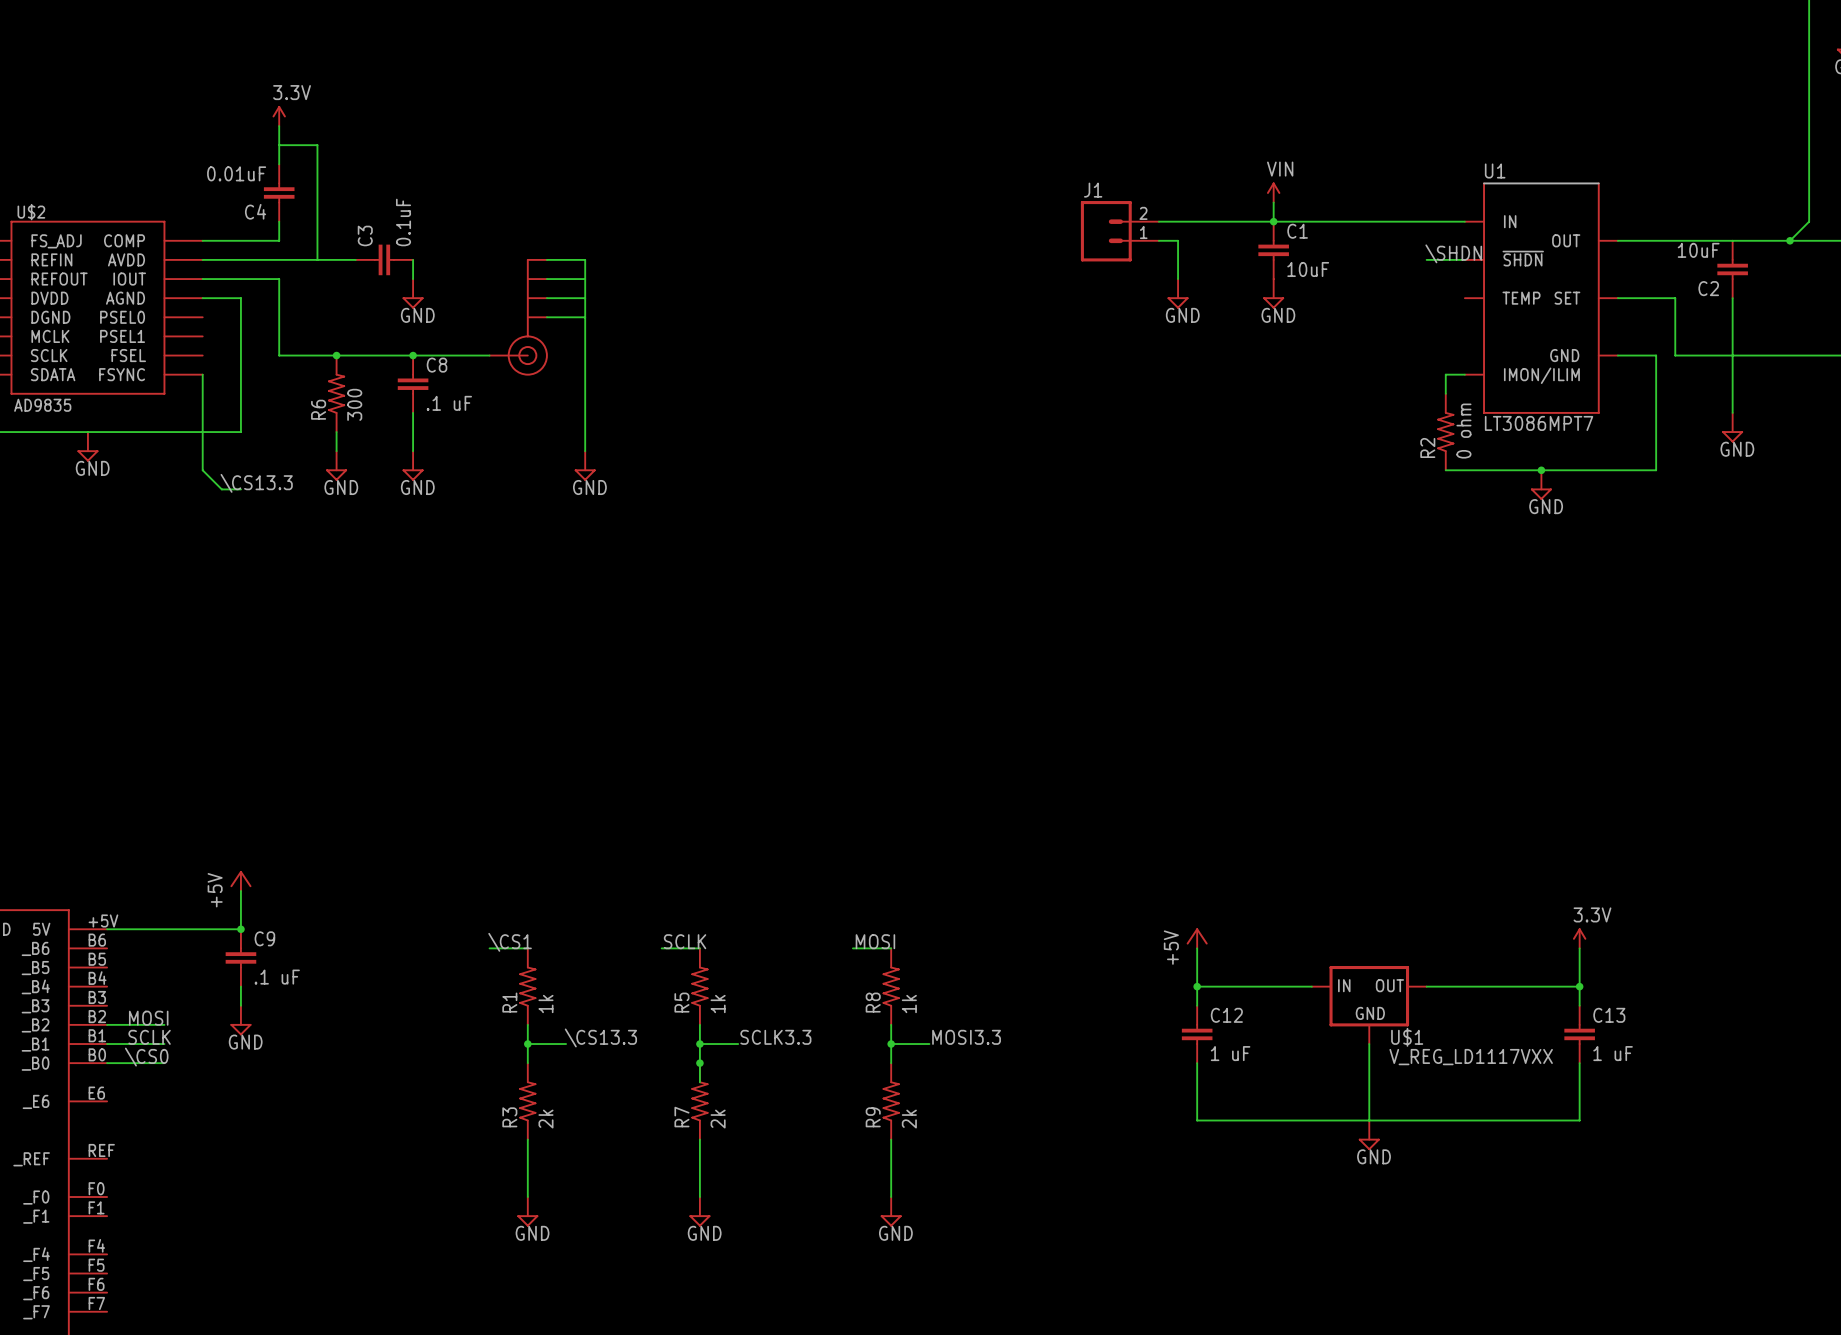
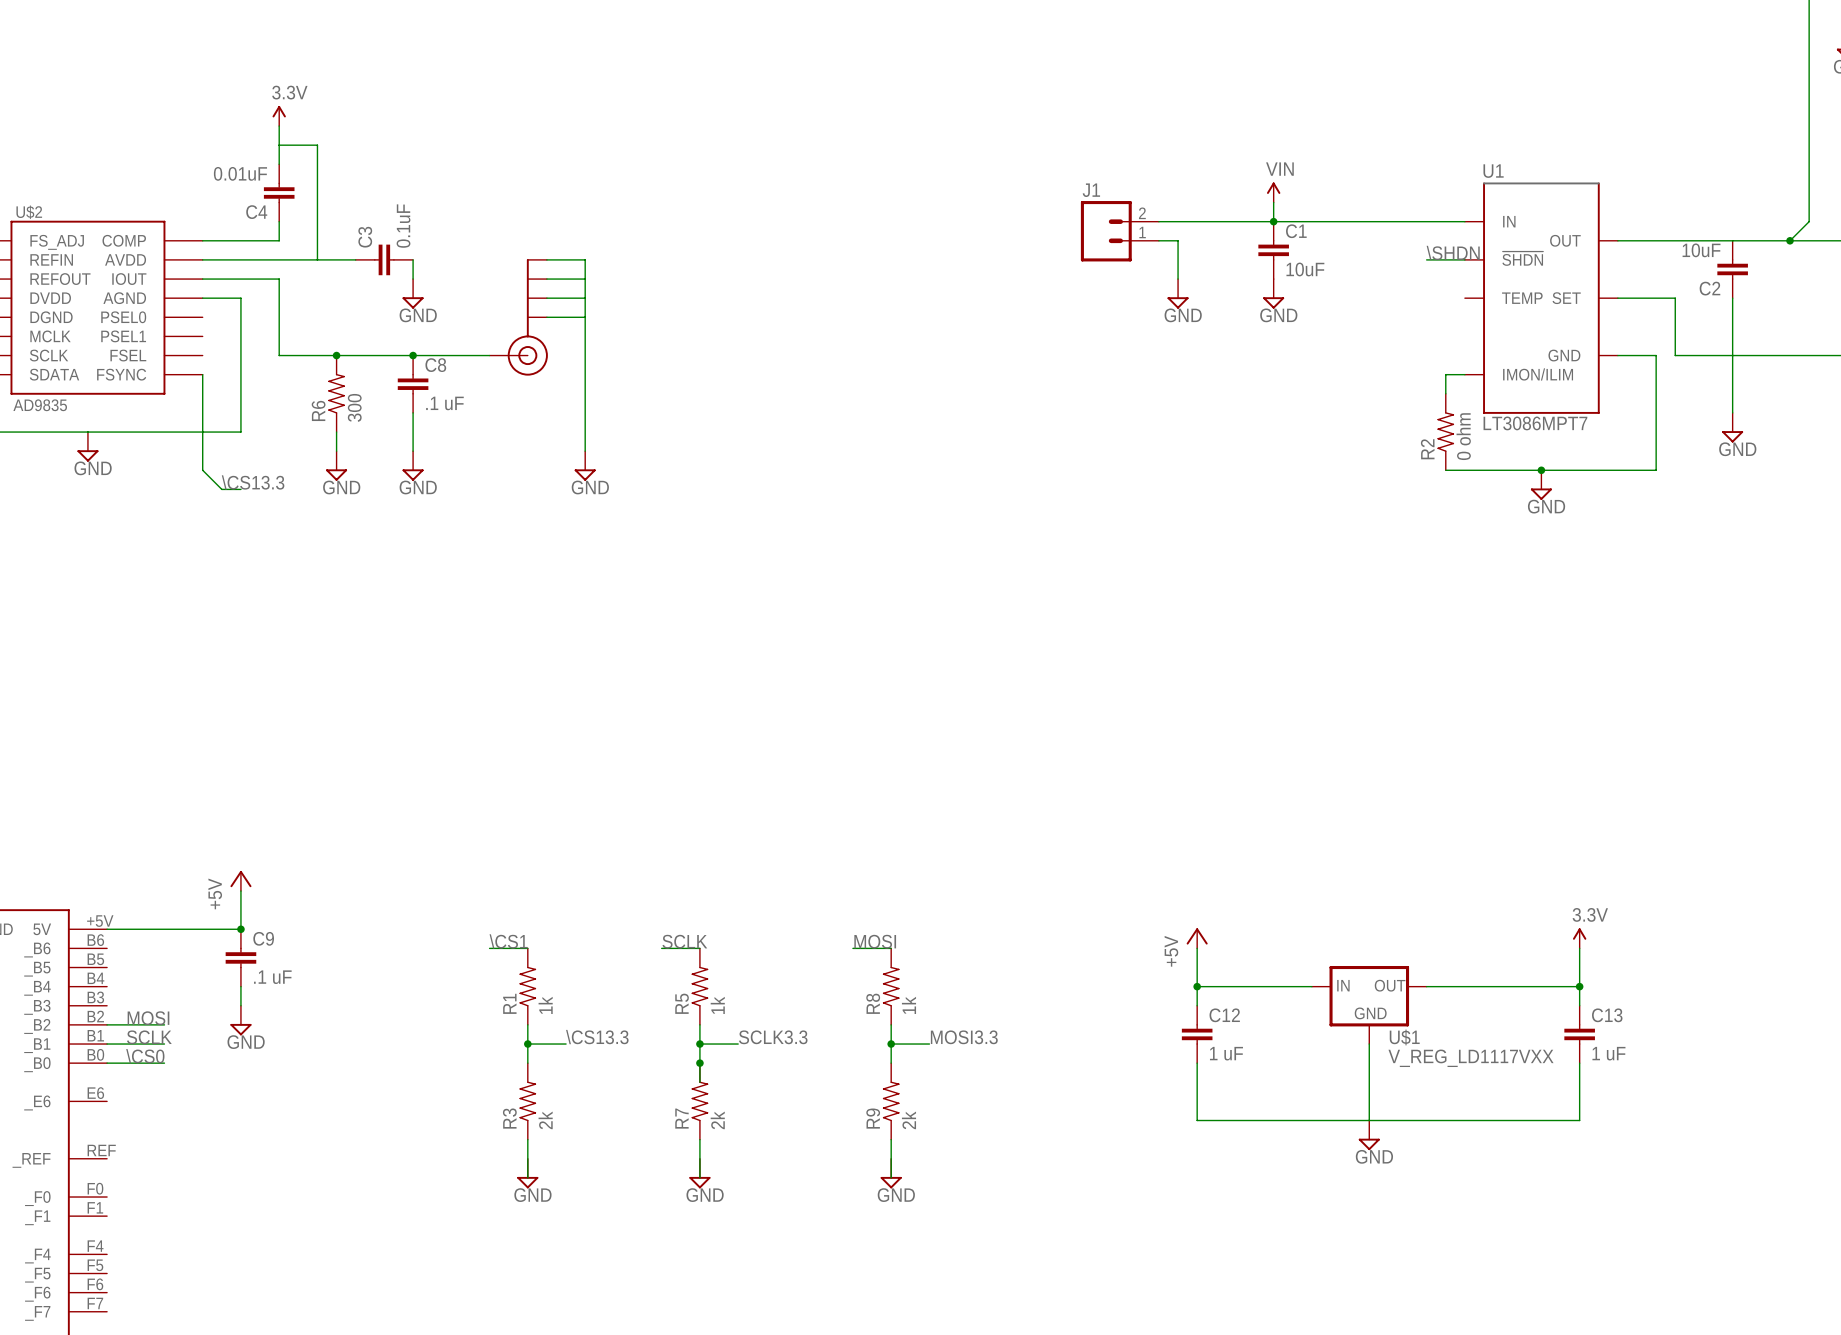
wire: (527, 1177) (527, 1197) -> none
wire: (699, 1177) (699, 1197) -> none
wire: (891, 1177) (891, 1197) -> none
power symbol position: GND (527, 1211) -> GND (527, 1173)
power symbol position: GND (699, 1211) -> GND (699, 1173)
power symbol position: GND (891, 1211) -> GND (891, 1173)

